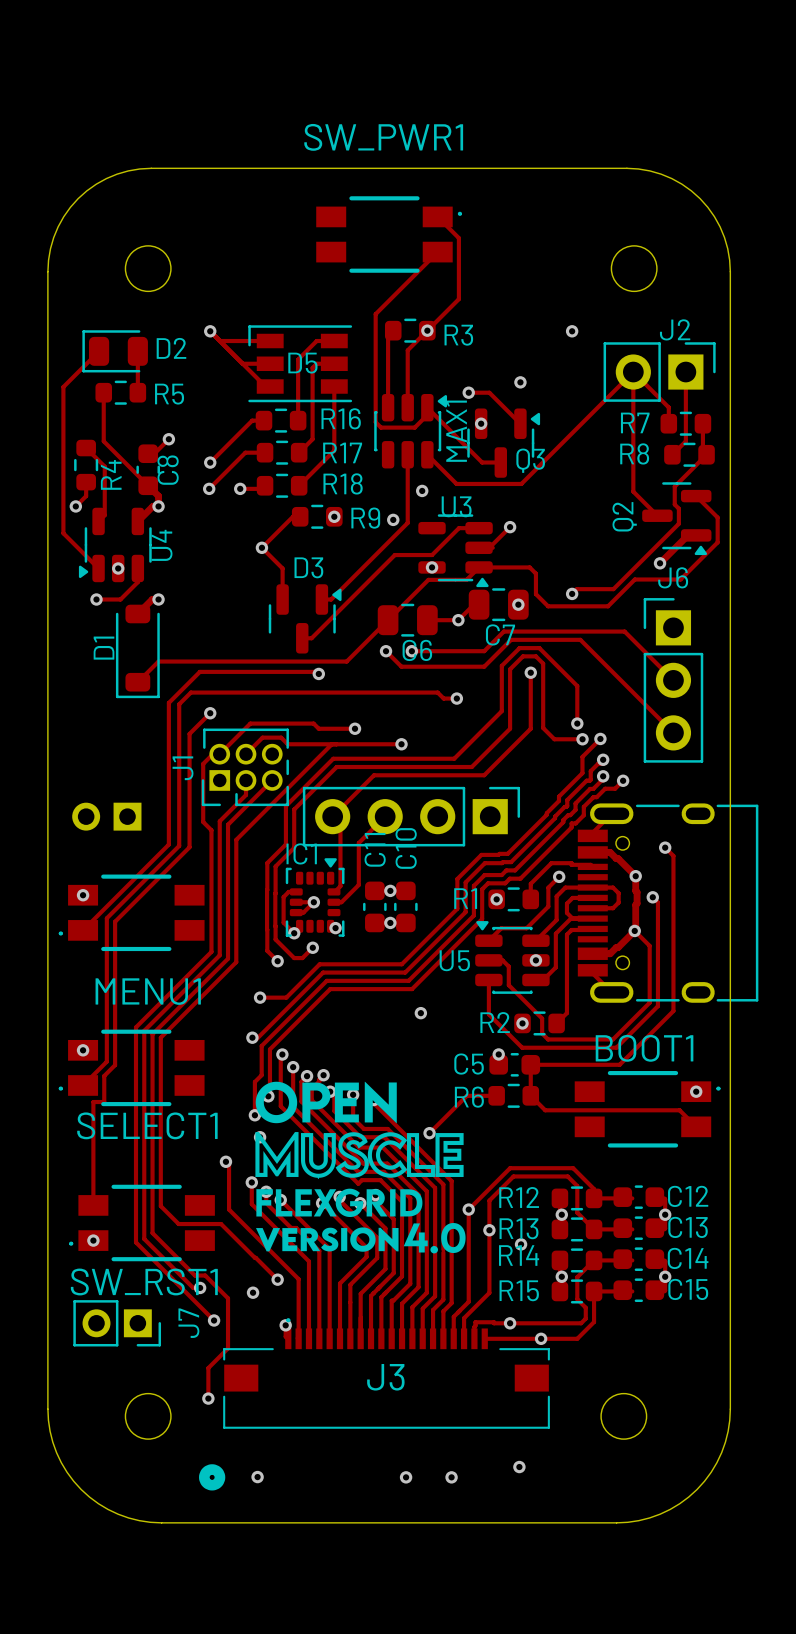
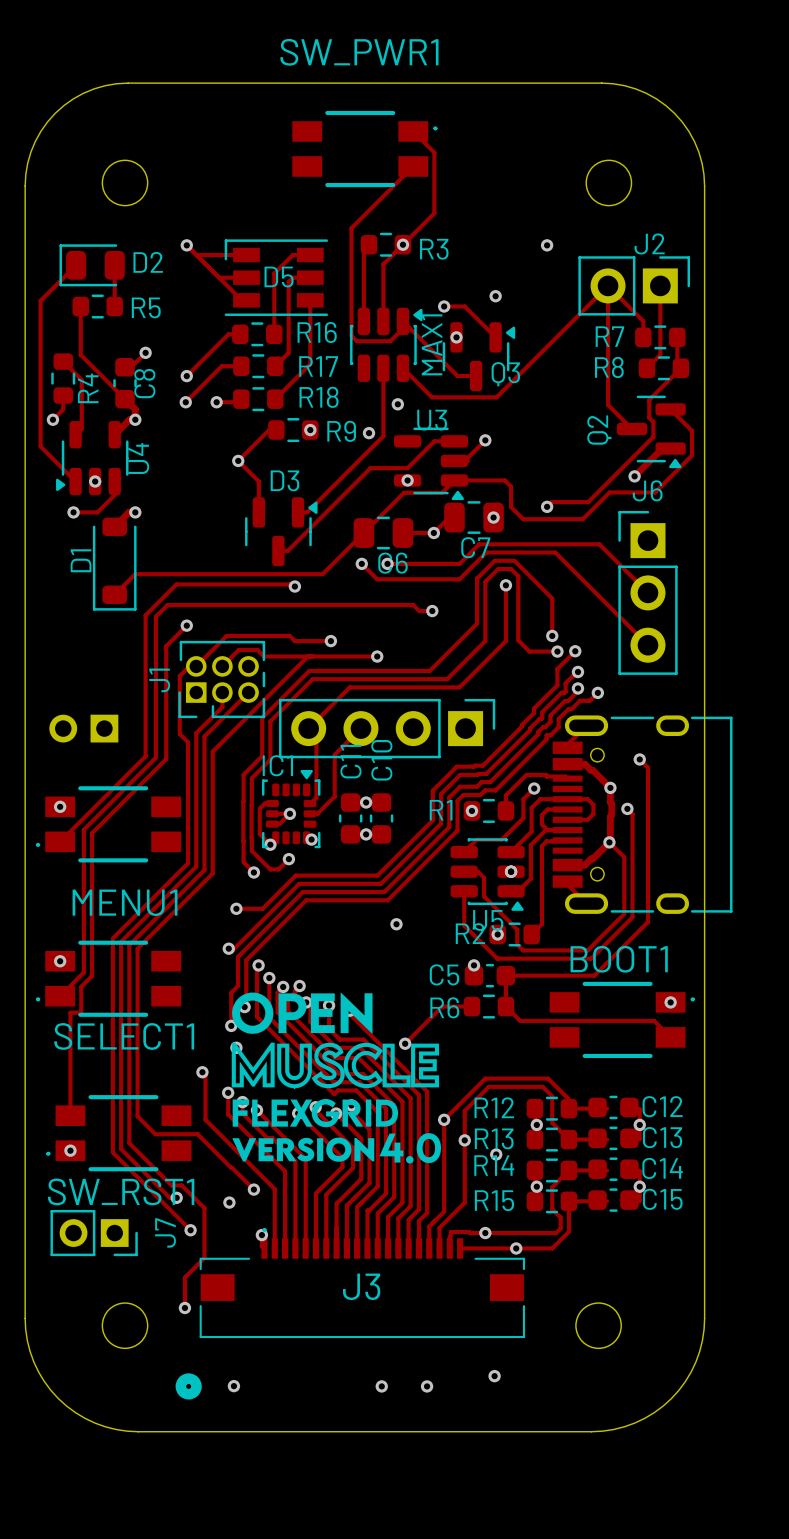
U5 rotation: 0° (512, 957) -> 180° (487, 874)
U5 name position: U5 (454, 960) -> U5 (488, 920)

